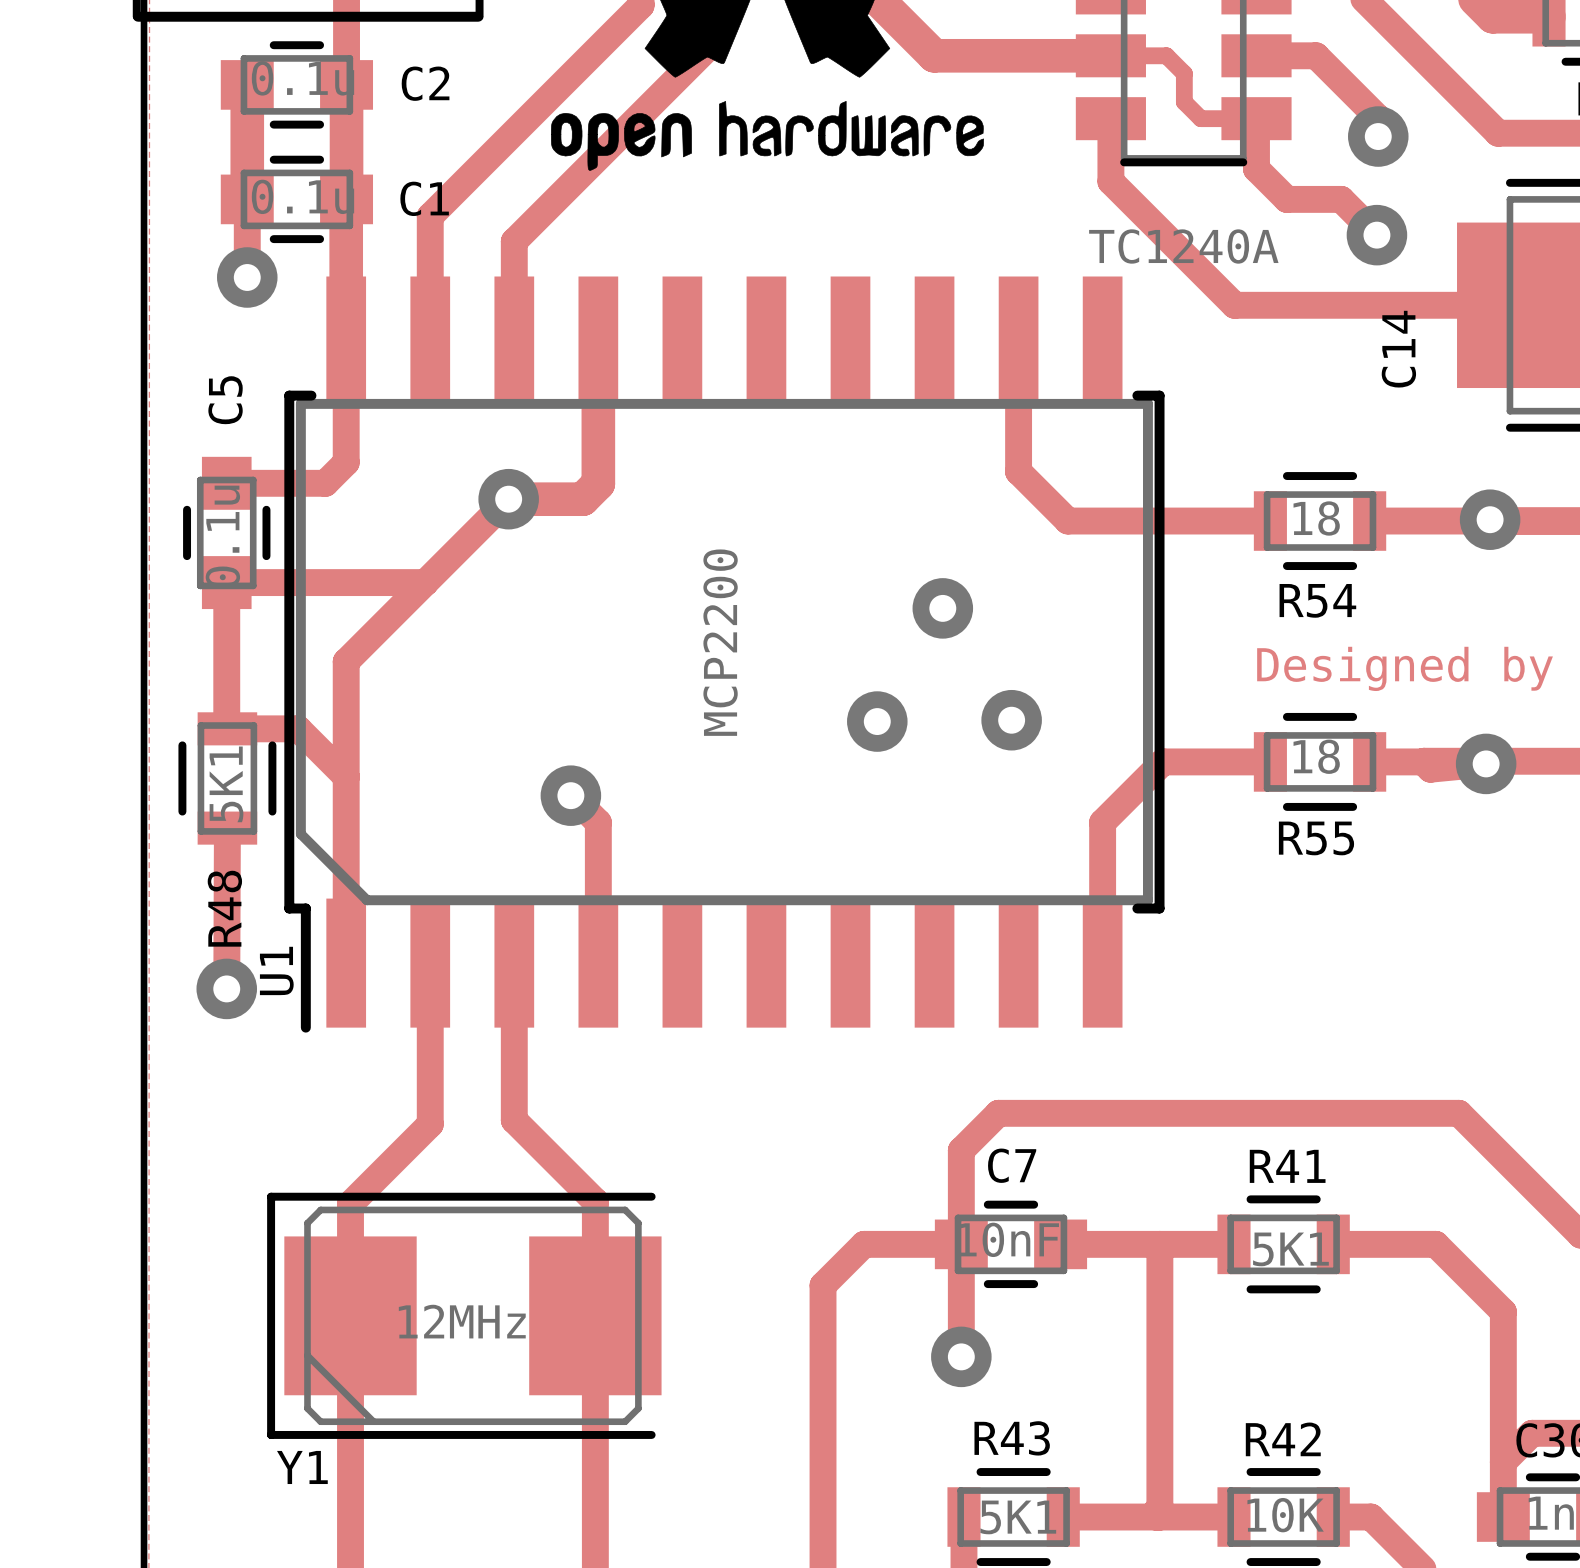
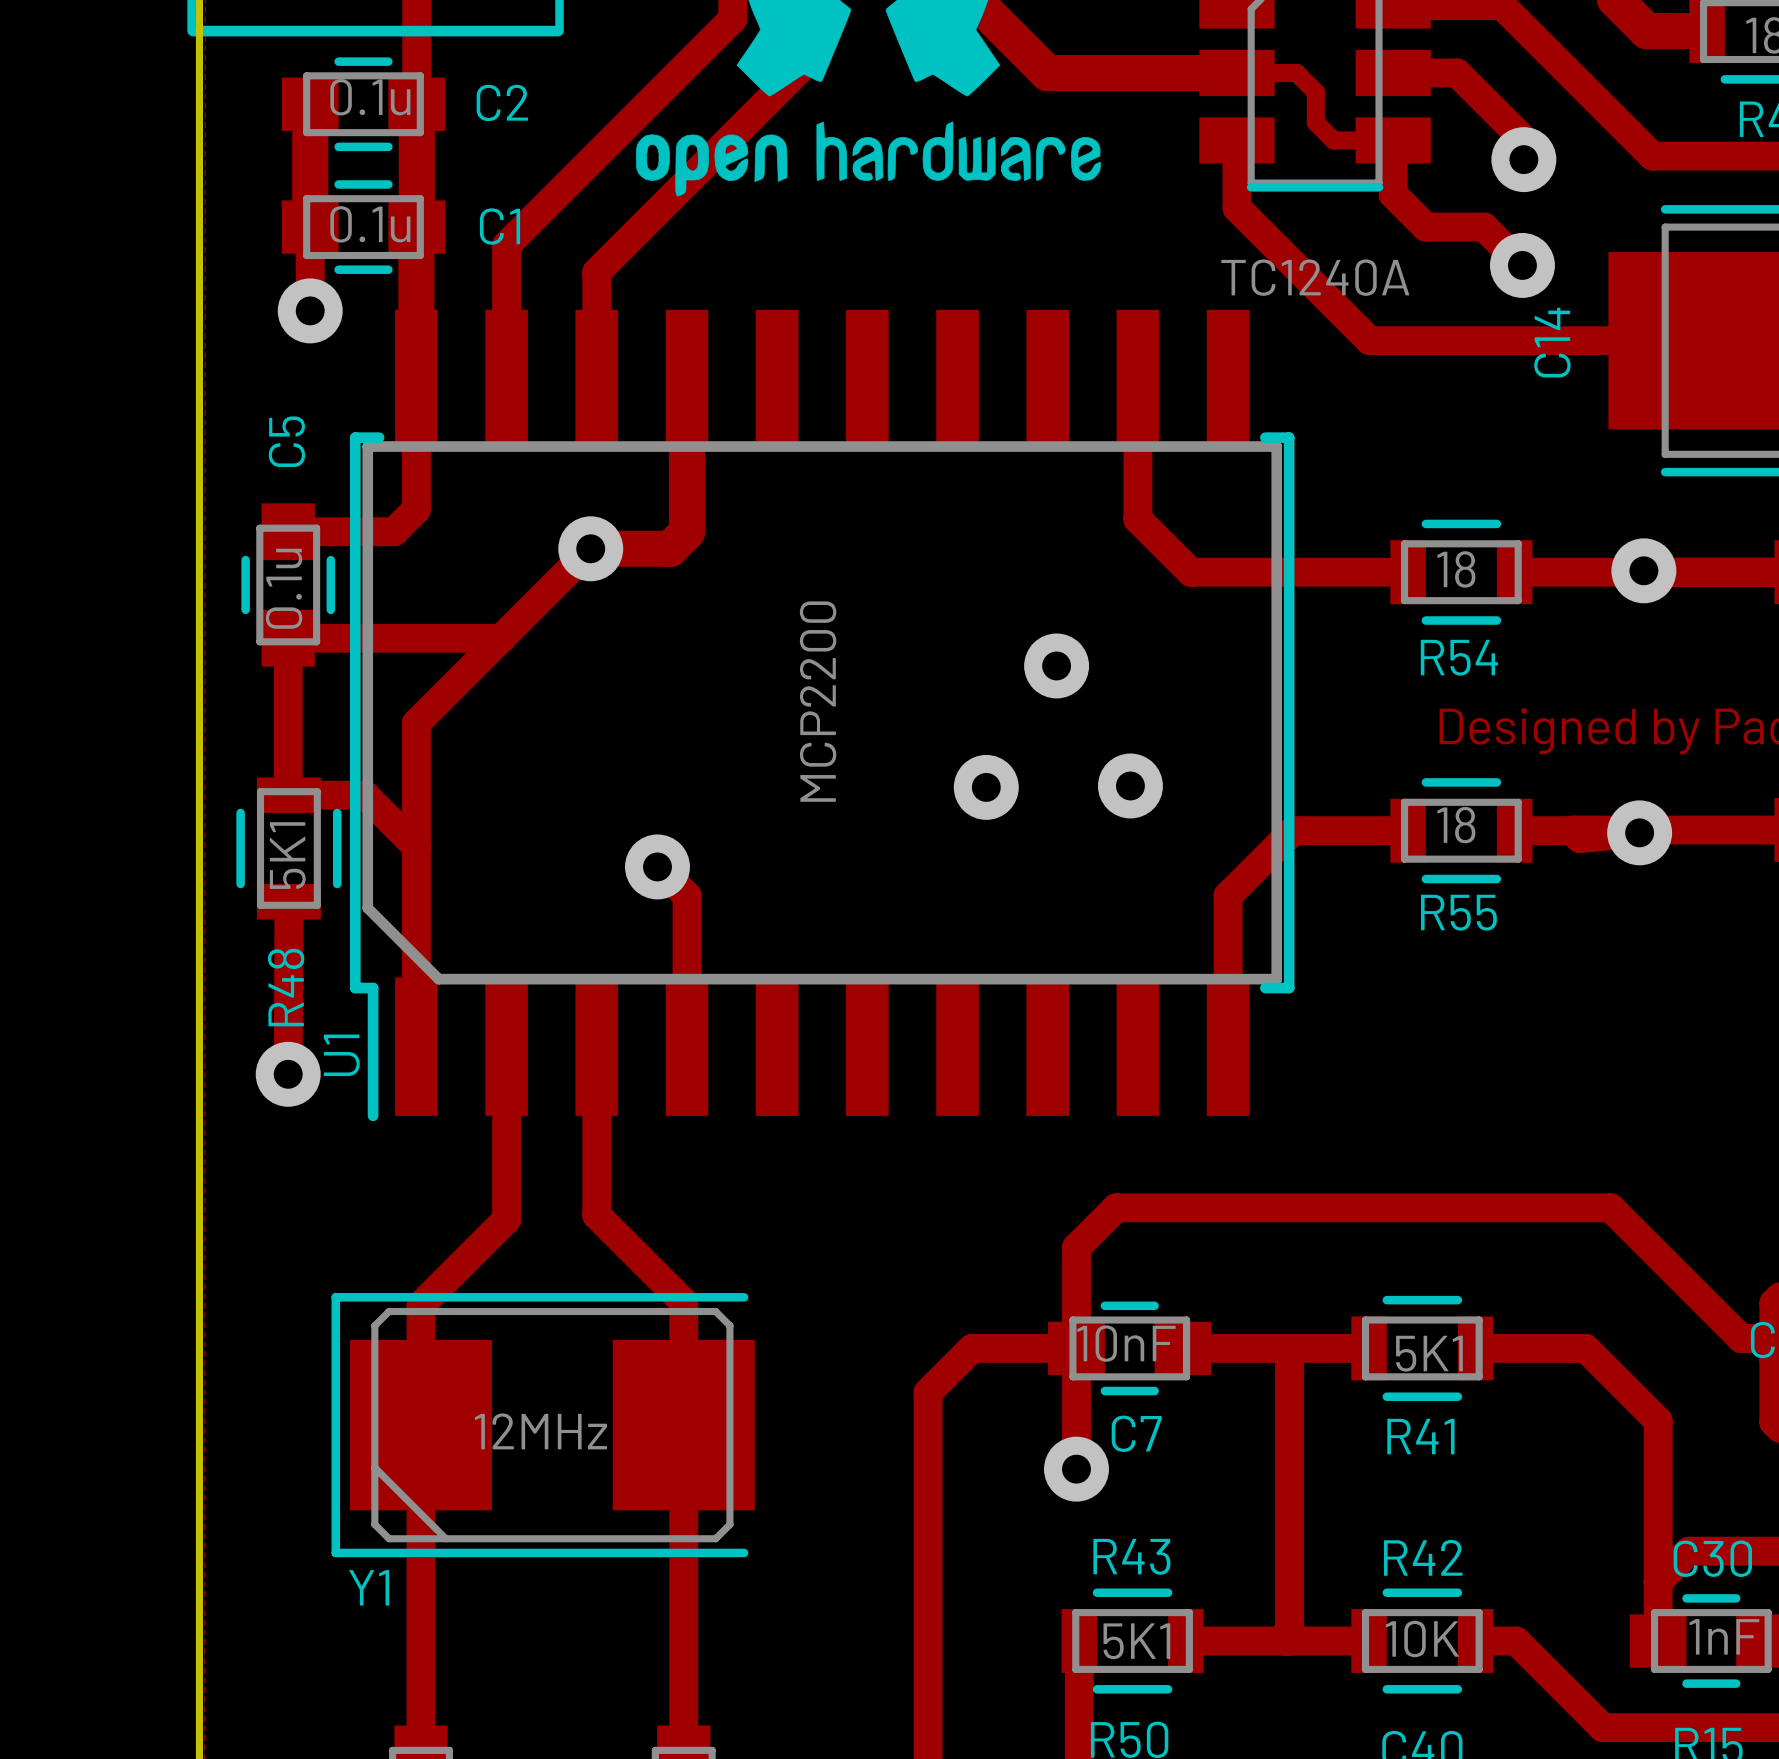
C14 name position: C14 (1398, 349) -> C14 (1552, 342)
C7 name position: C7 (1012, 1165) -> C7 (1136, 1433)
R41 name position: R41 (1287, 1166) -> R41 (1420, 1436)

